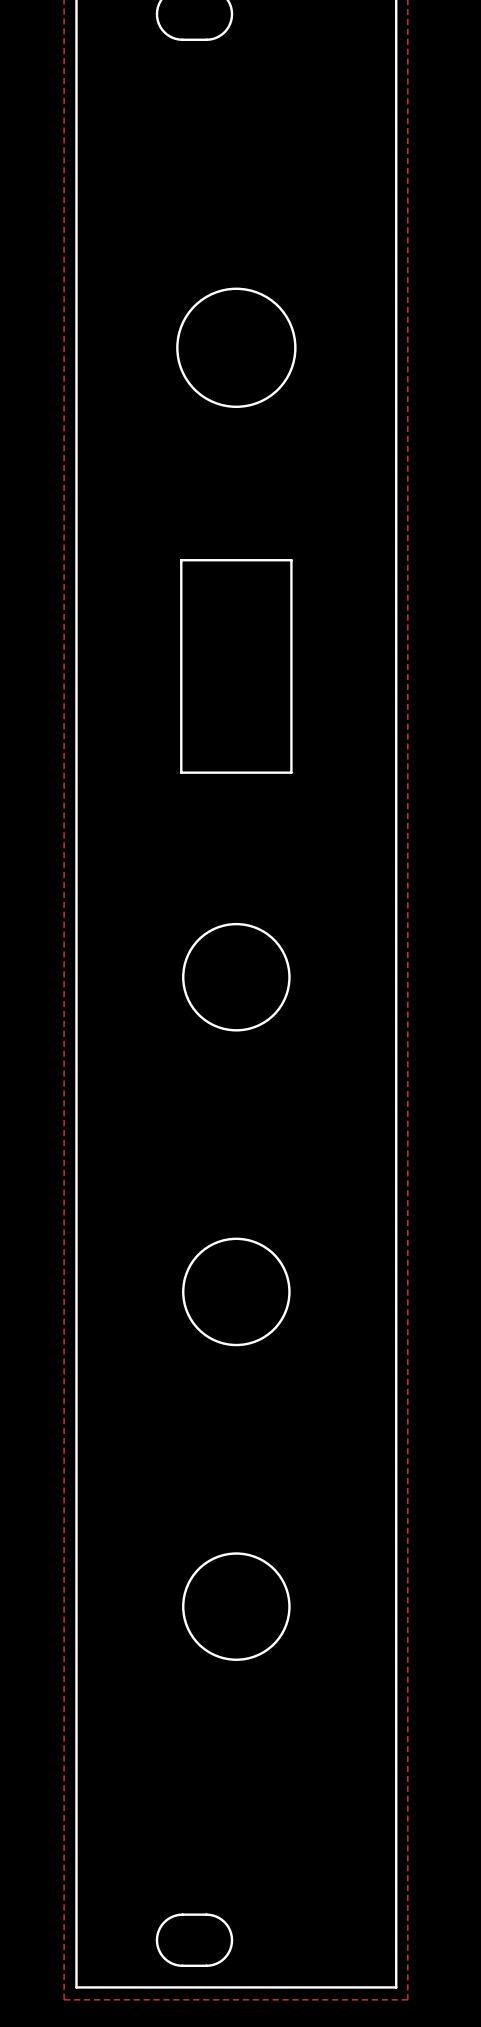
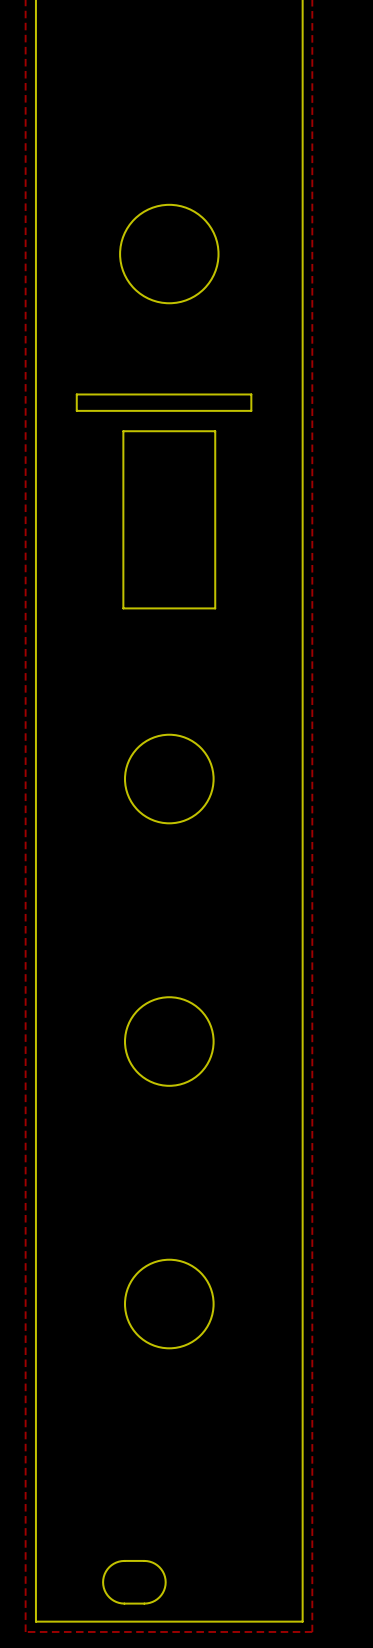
board edge: none -> (76, 394) (251, 394) (251, 410) (76, 410) (76, 394)

